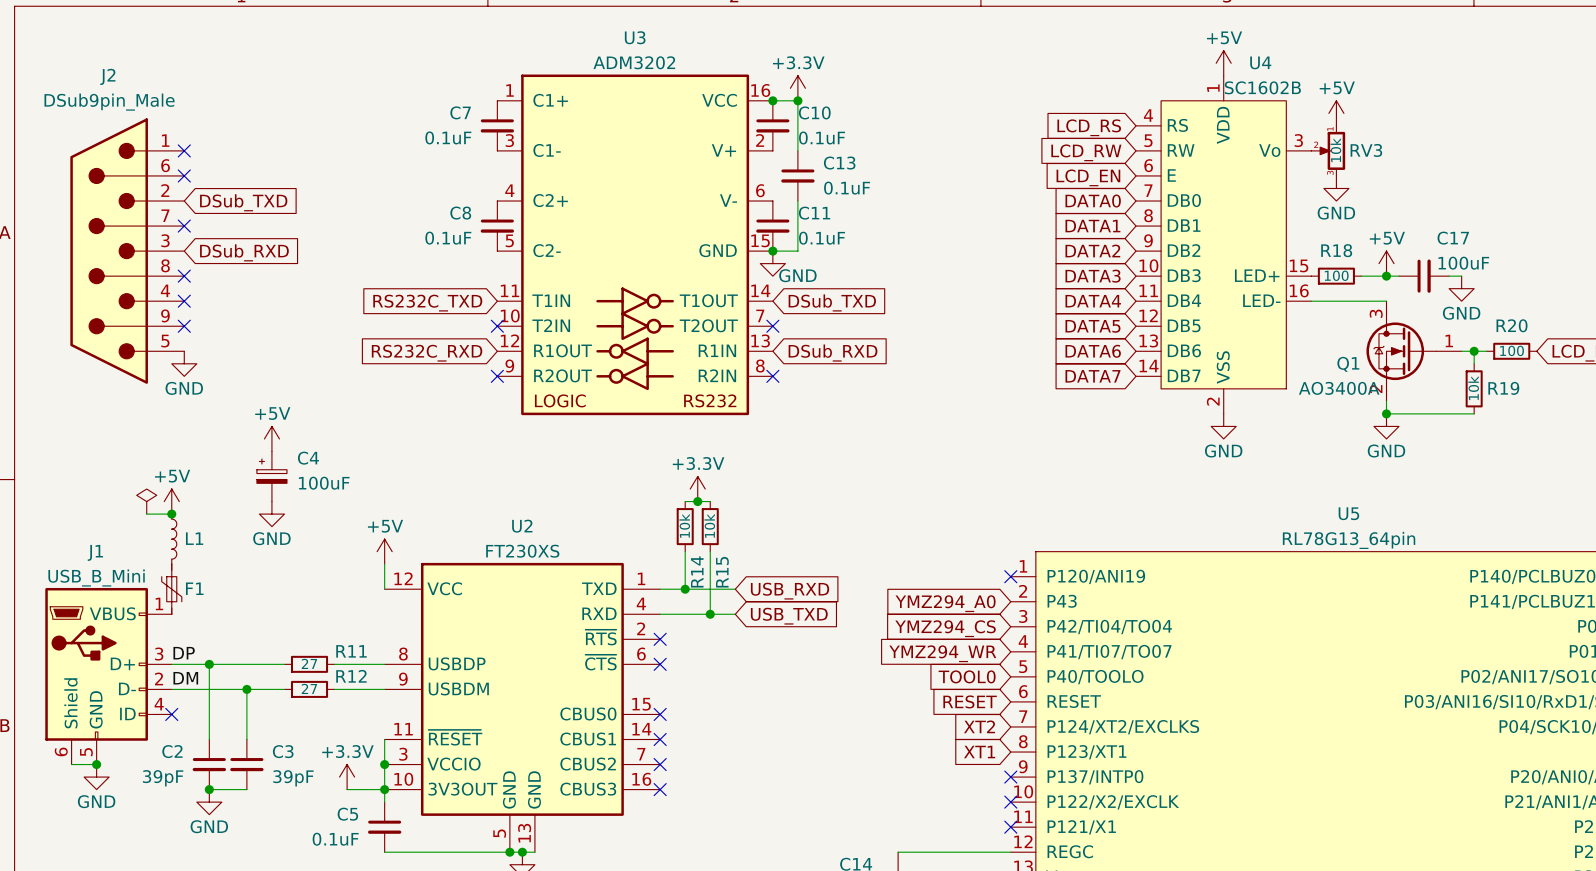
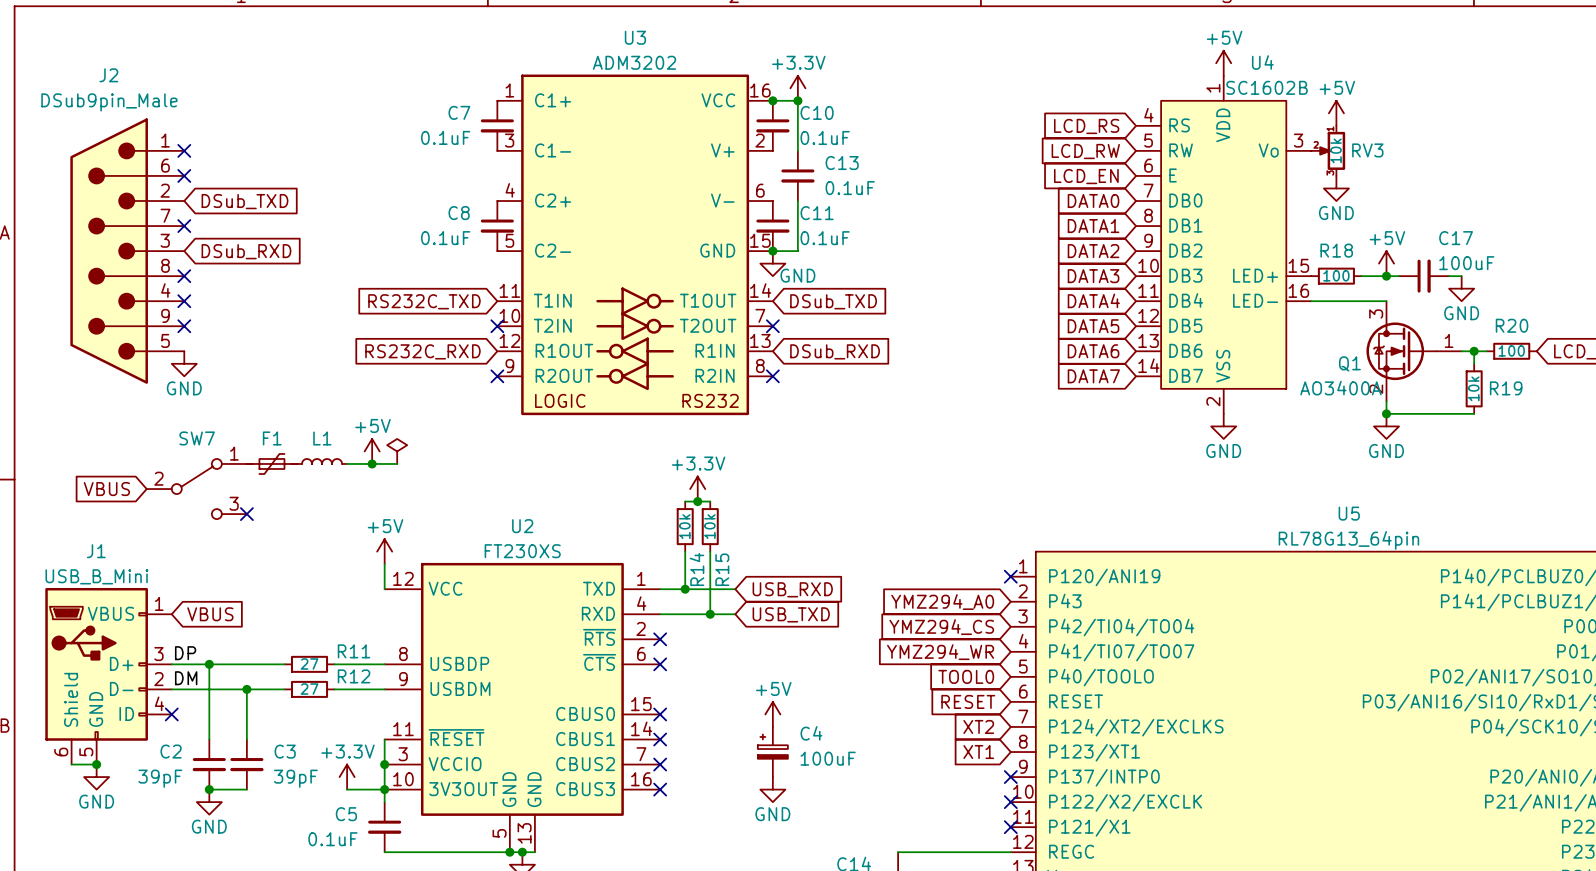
power symbol position: +5V (271, 438) -> +5V (372, 451)
power symbol: none -> (397, 451)
wire: none -> (347, 463) (397, 463)
junction: none -> (372, 463)
C4 position: (271, 476) -> (772, 752)
global label: none -> VBUS (106, 489)
SW7: none -> (196, 489)
power symbol: (146, 501) -> none
power symbol: +5V (171, 501) -> none
wire: (146, 514) (171, 514) -> none
junction: (171, 514) -> none
no-connect mark: none -> (246, 514)
power symbol: GND (271, 514) -> none
L1 rotation: 0° (174, 539) -> 90° counterclockwise (322, 461)
L1 position: (174, 539) -> (322, 461)
F1 name position: F1 (194, 588) -> F1 (272, 438)
F1 rotation: 0° (171, 589) -> 90° clockwise (271, 463)
F1 position: (171, 589) -> (271, 463)
global label: none -> VBUS (210, 614)
power symbol: none -> +5V (772, 714)
power symbol: none -> GND (772, 789)

